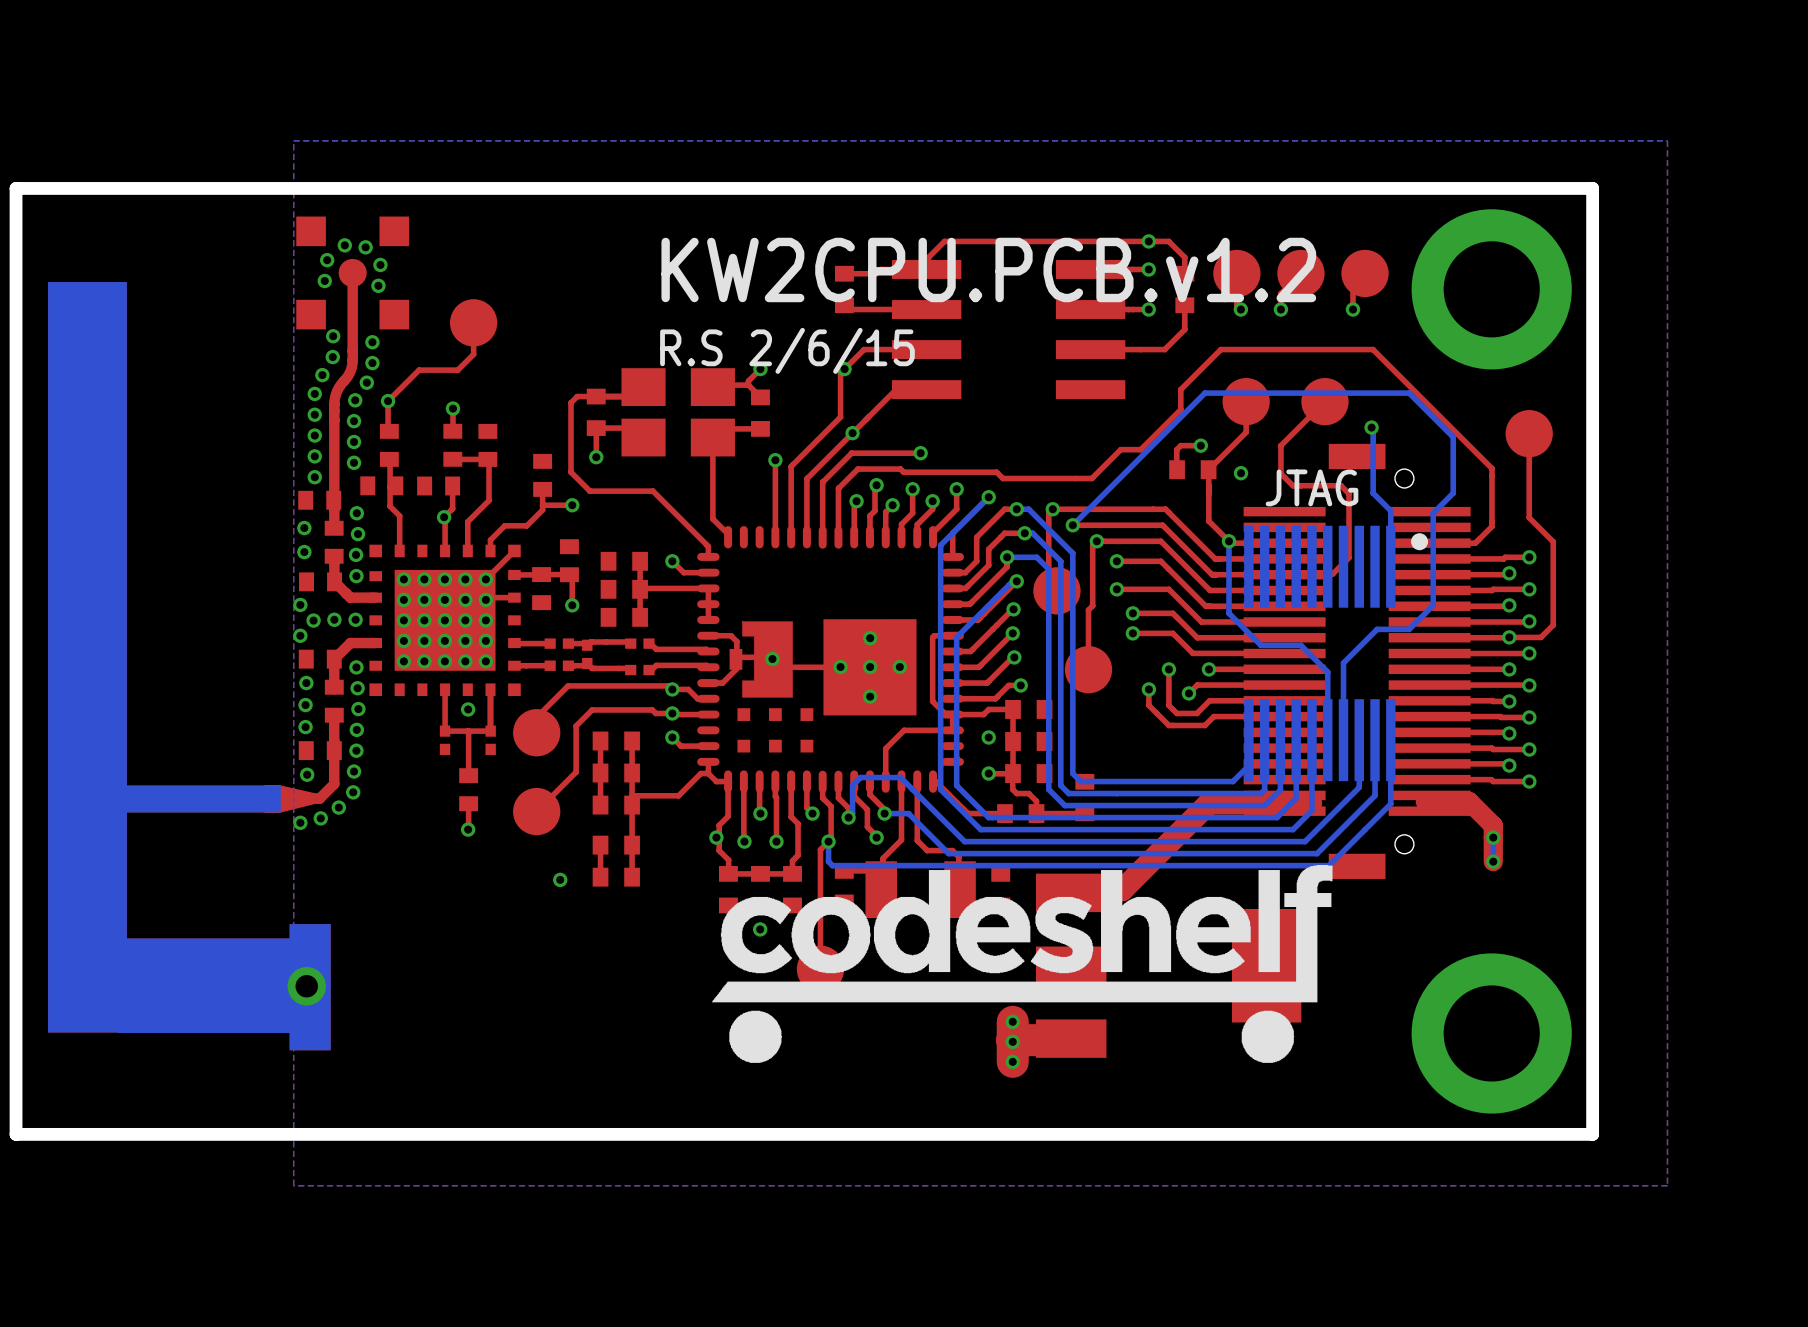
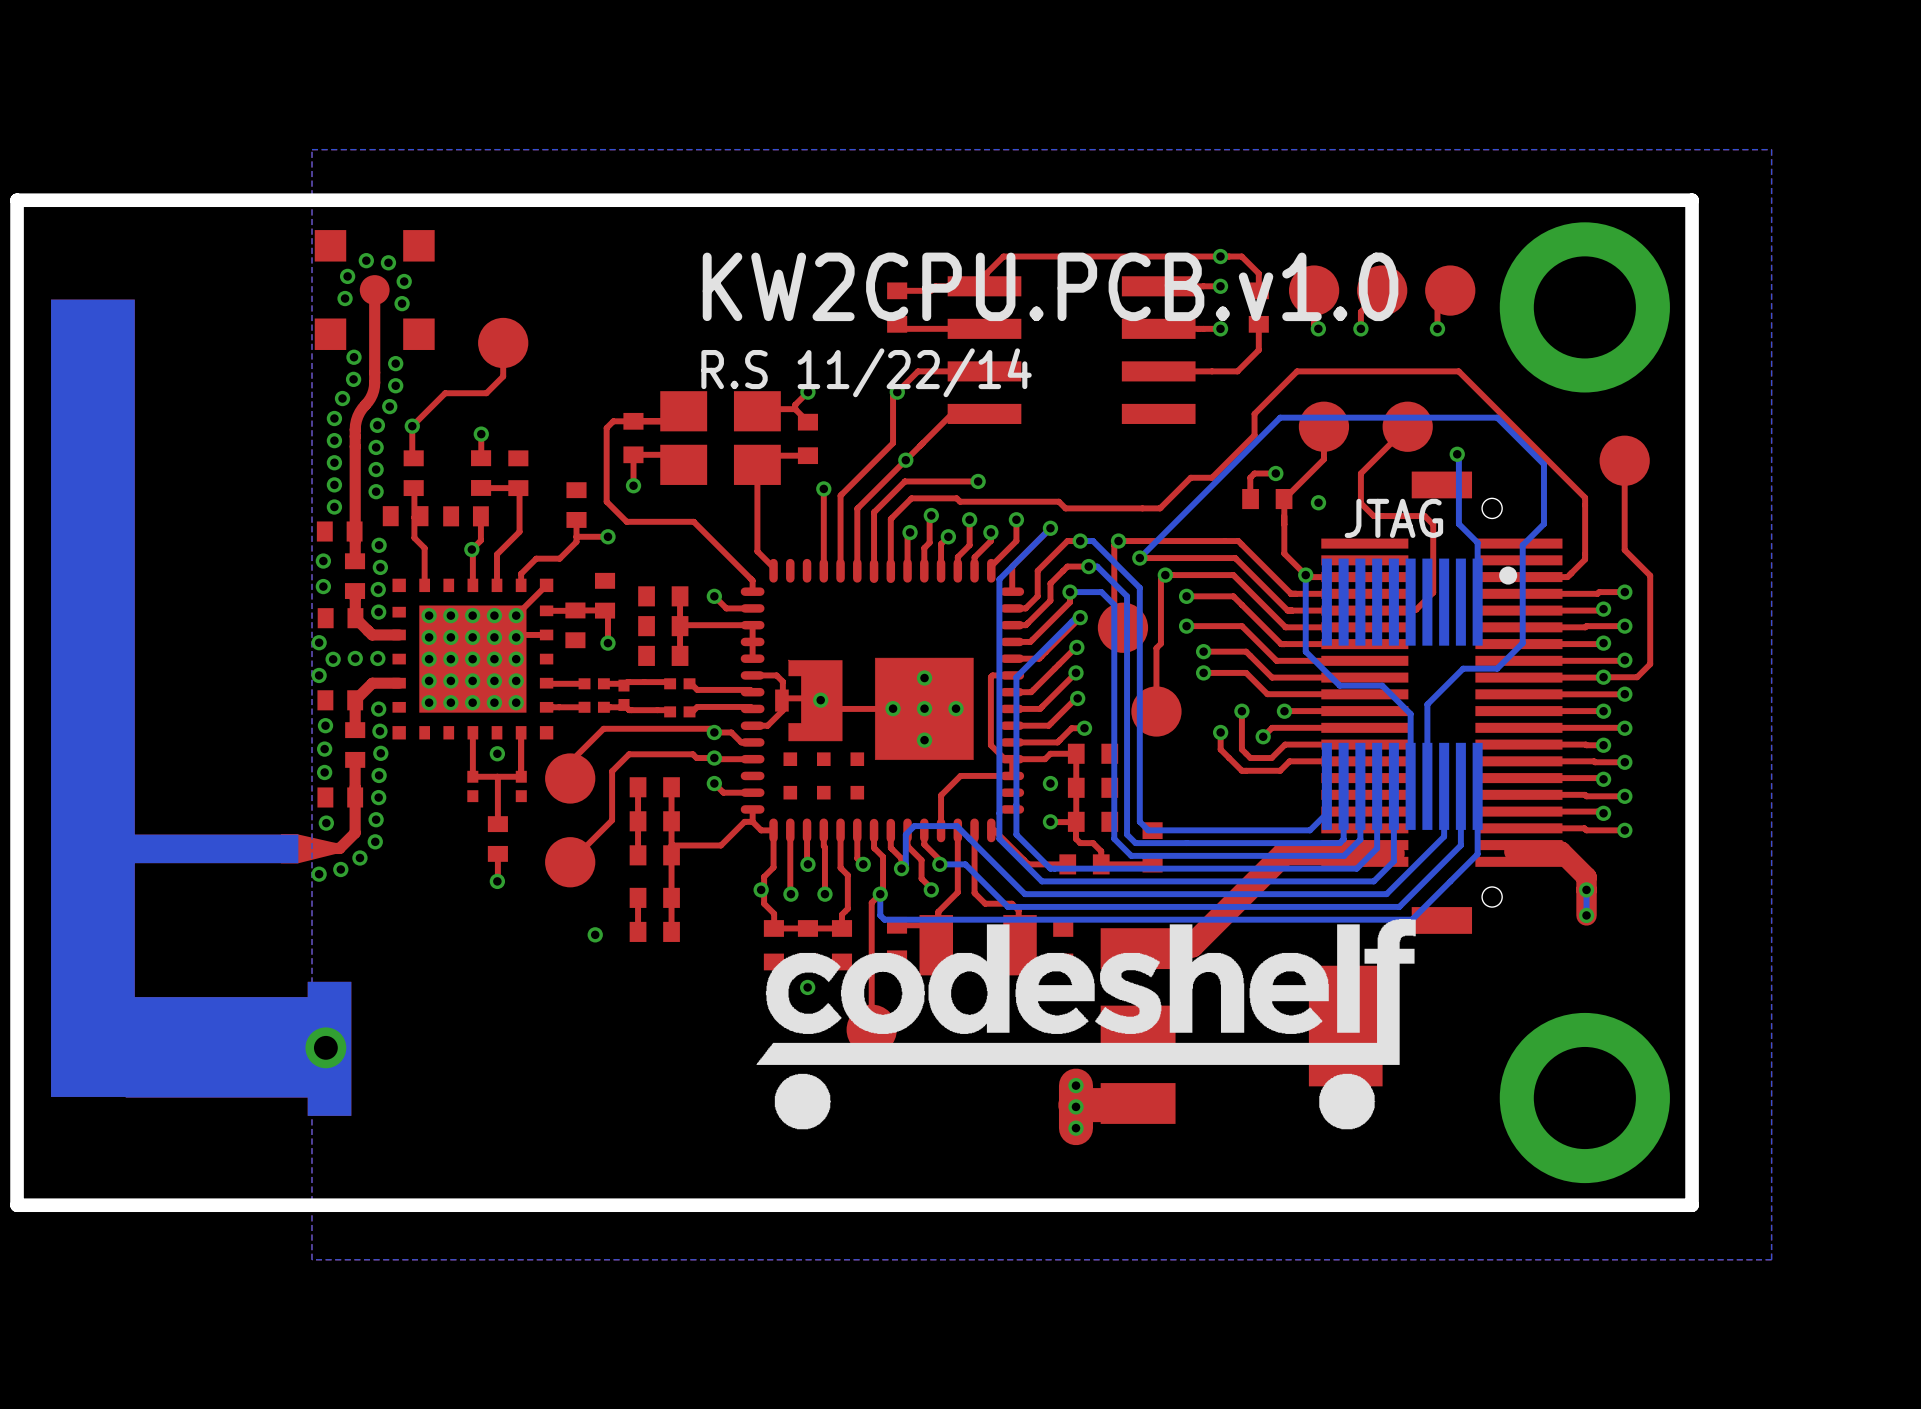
text: KW2CPU.PCB.v1.2 (988, 269) -> KW2CPU.PCB.v1.0 (1050, 286)
text: R.S 2/6/15 (787, 350) -> R.S 11/22/14 (866, 372)

